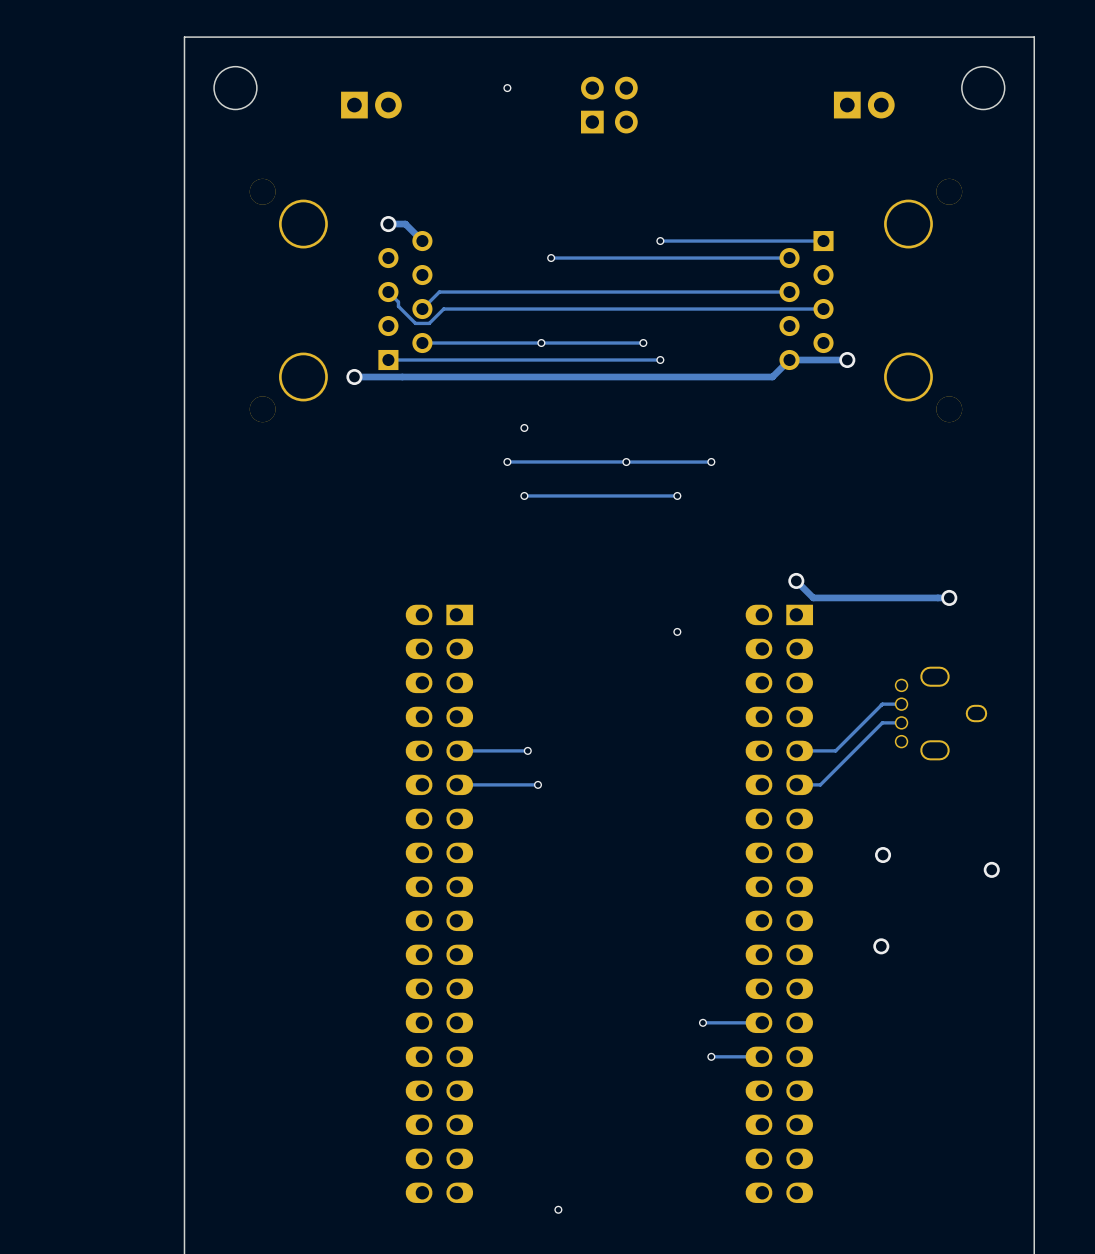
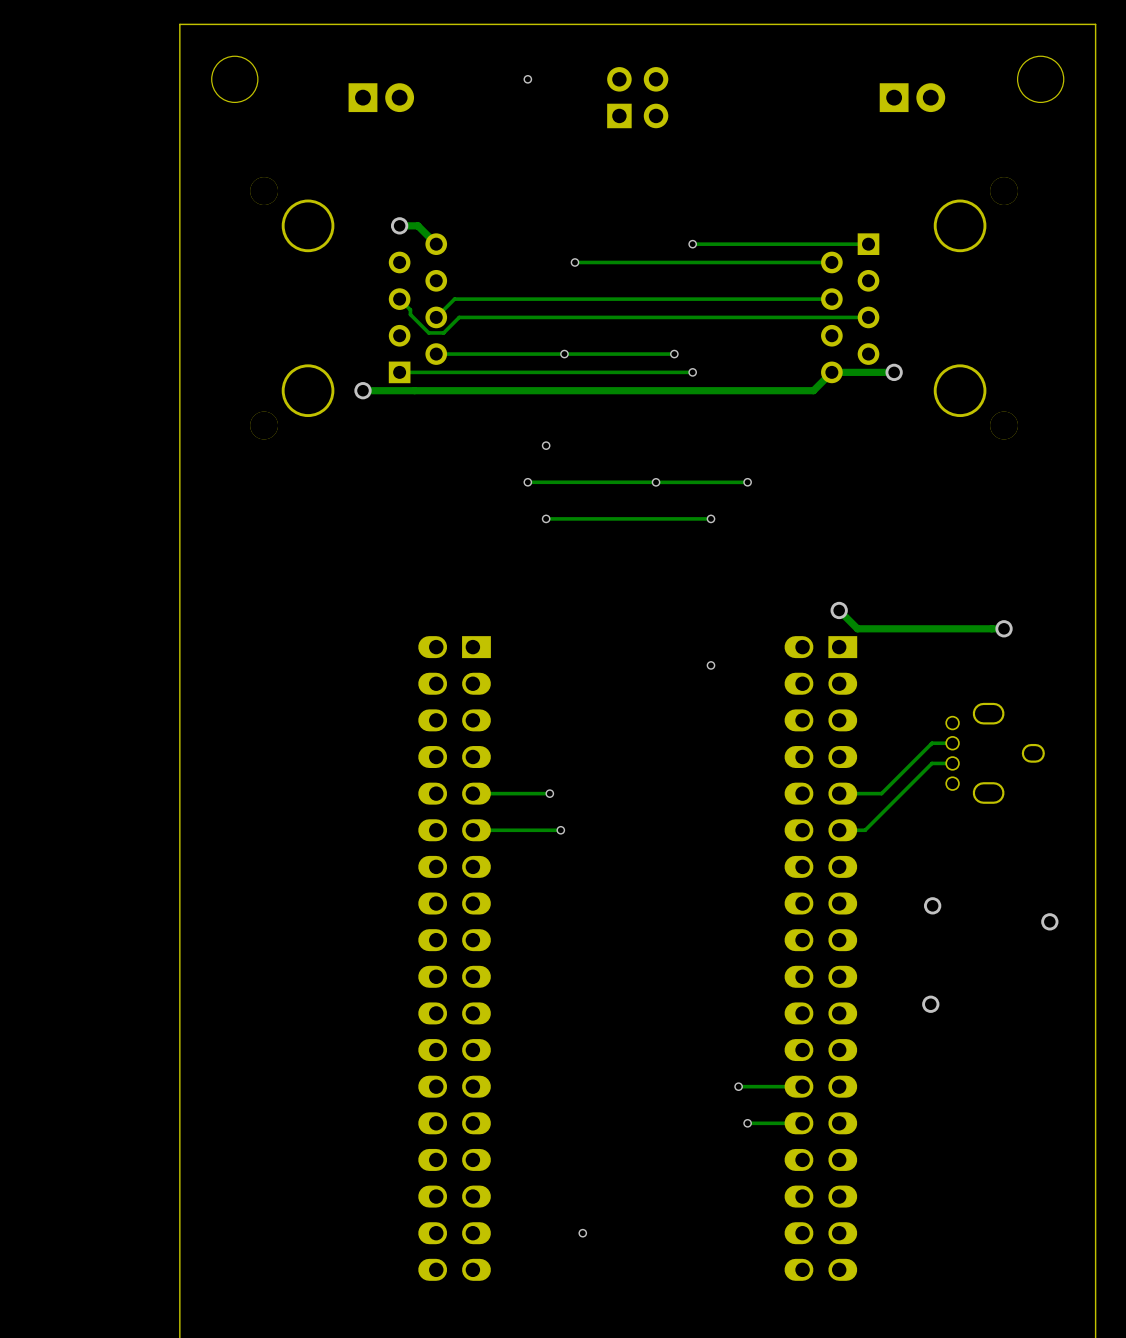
via position: (558, 1209) -> (582, 1233)

